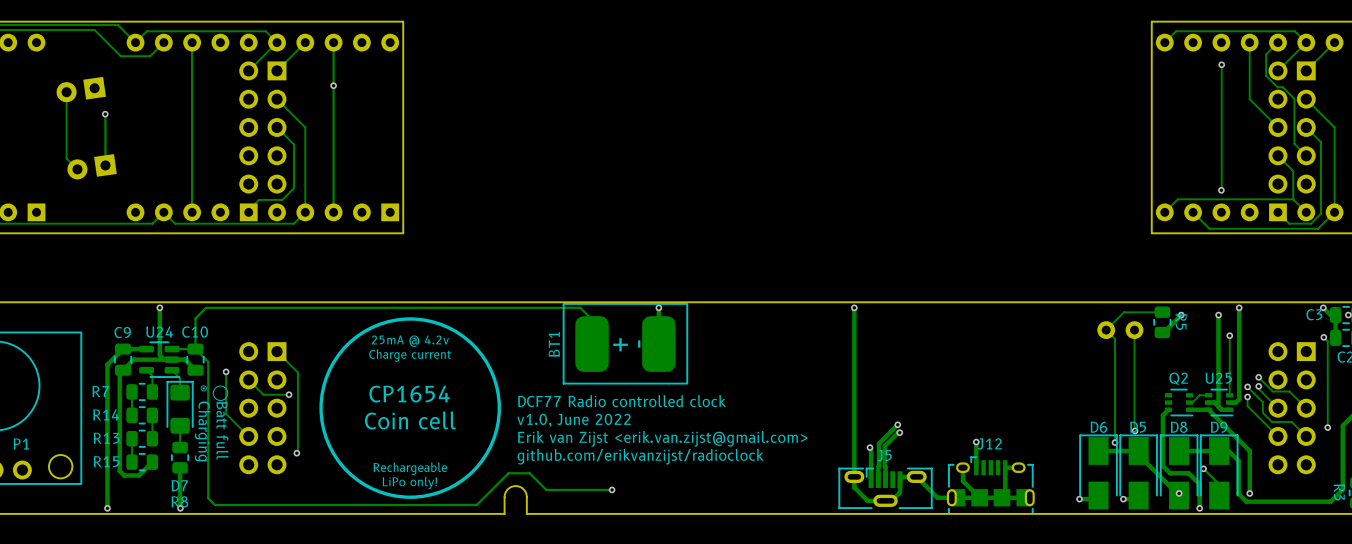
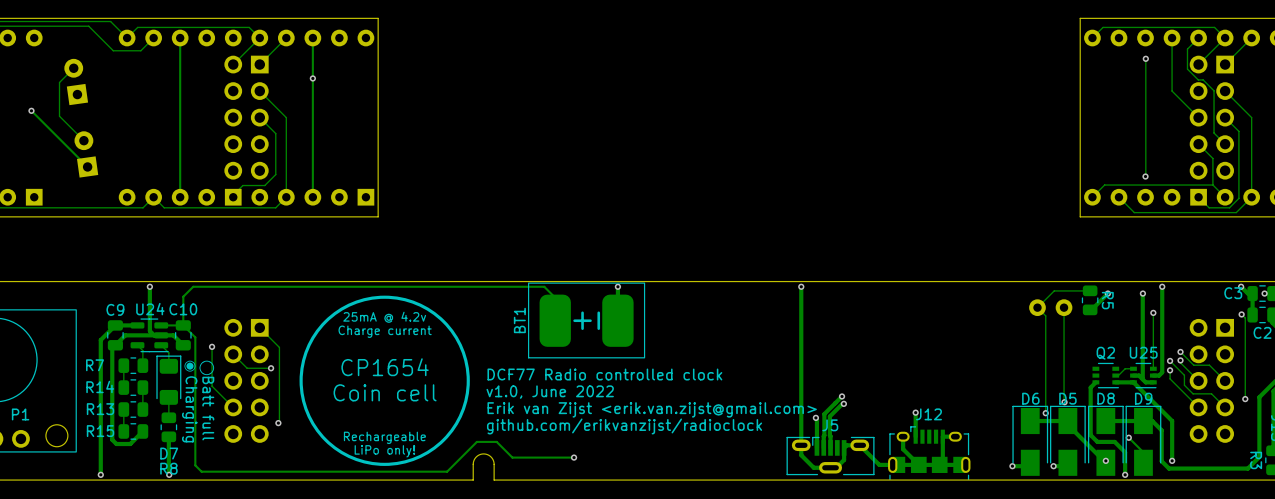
track: none -> (73, 68) (59, 82) (59, 116) (83, 140)
part rotation: 0° (81, 89) -> 90° clockwise (76, 82)
track: (66, 92) (66, 158) (77, 169) -> none
track: (105, 114) (105, 165) -> none
via: (105, 114) -> none
track: none -> (31, 110) (87, 166)
via: none -> (31, 110)
part rotation: 0° (92, 166) -> 90° clockwise (86, 154)

